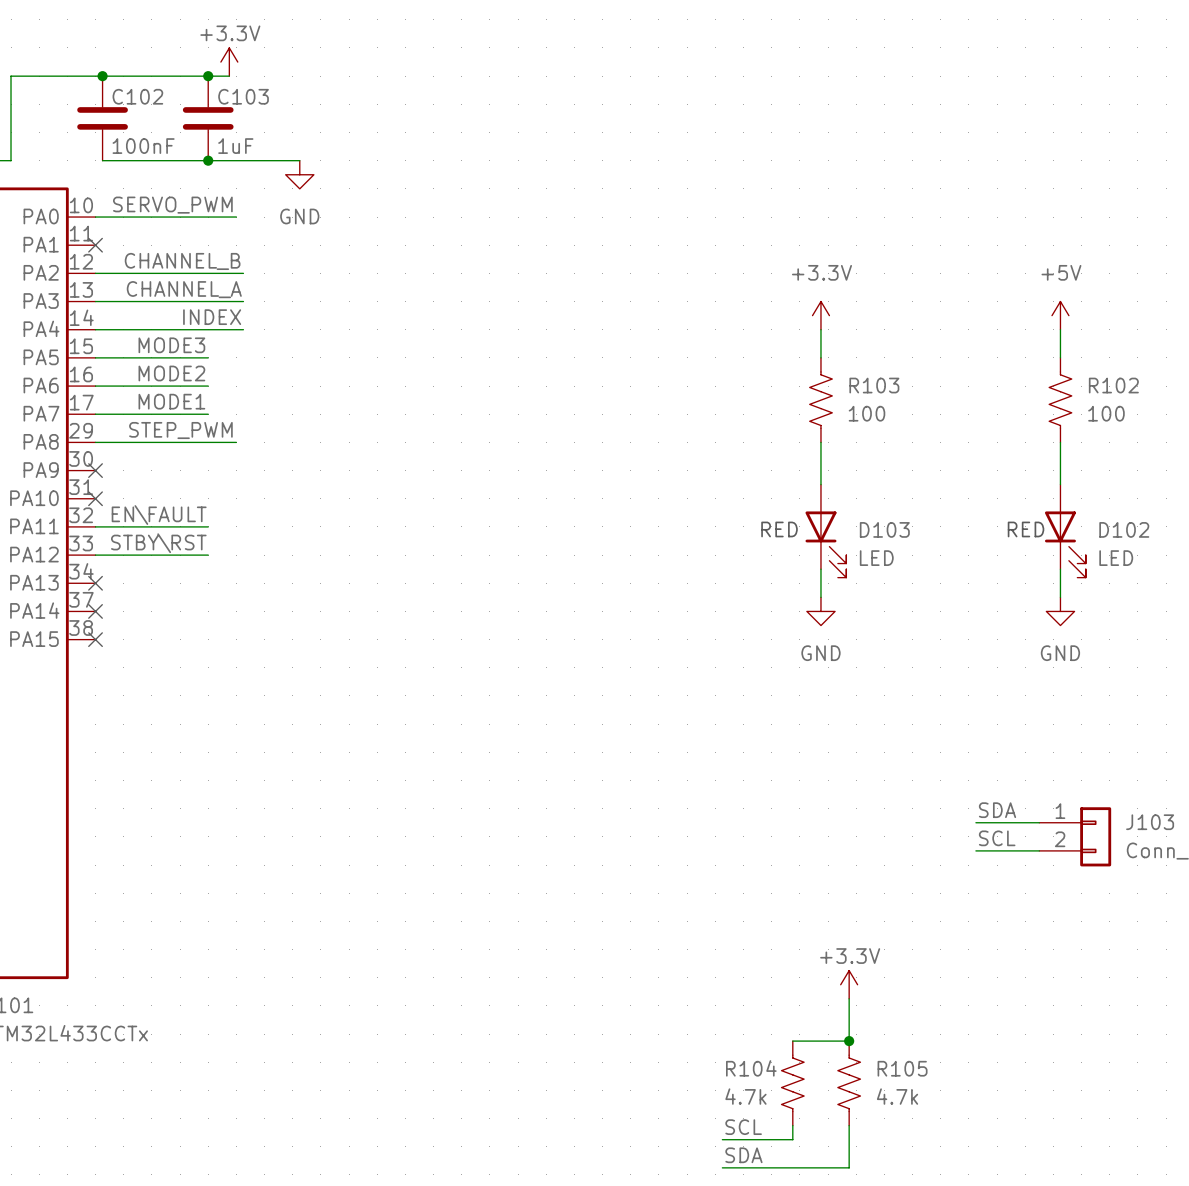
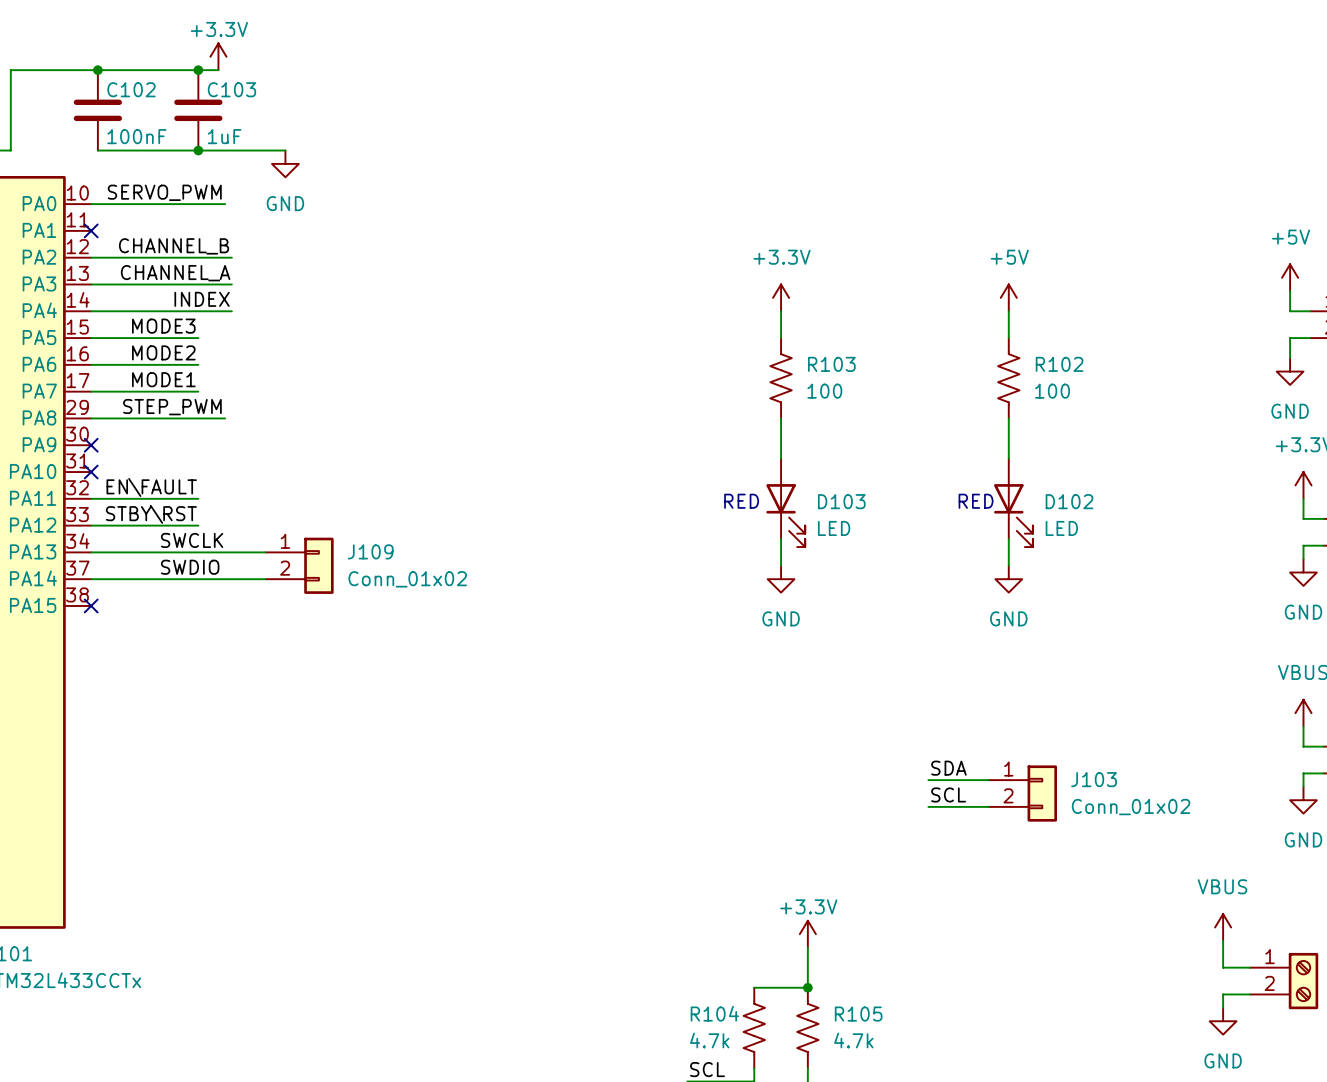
label: none -> SWCLK (192, 540)
wire: none -> (91, 552) (265, 552)
no-connect mark: (95, 583) -> none
J109: none -> Conn_01x02 (299, 565)
label: none -> SWDIO (190, 567)
wire: none -> (91, 579) (265, 579)
no-connect mark: (95, 611) -> none

